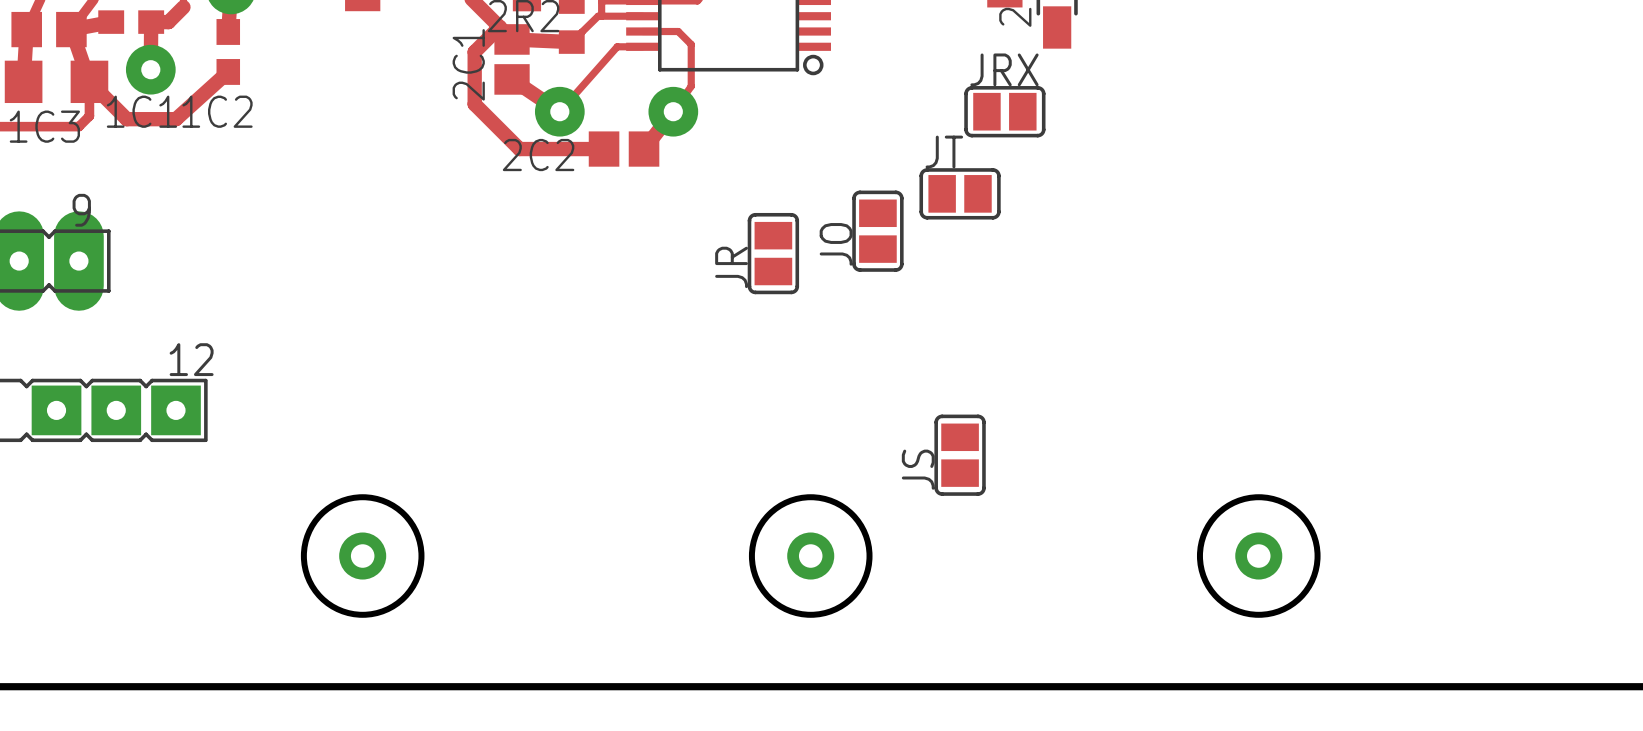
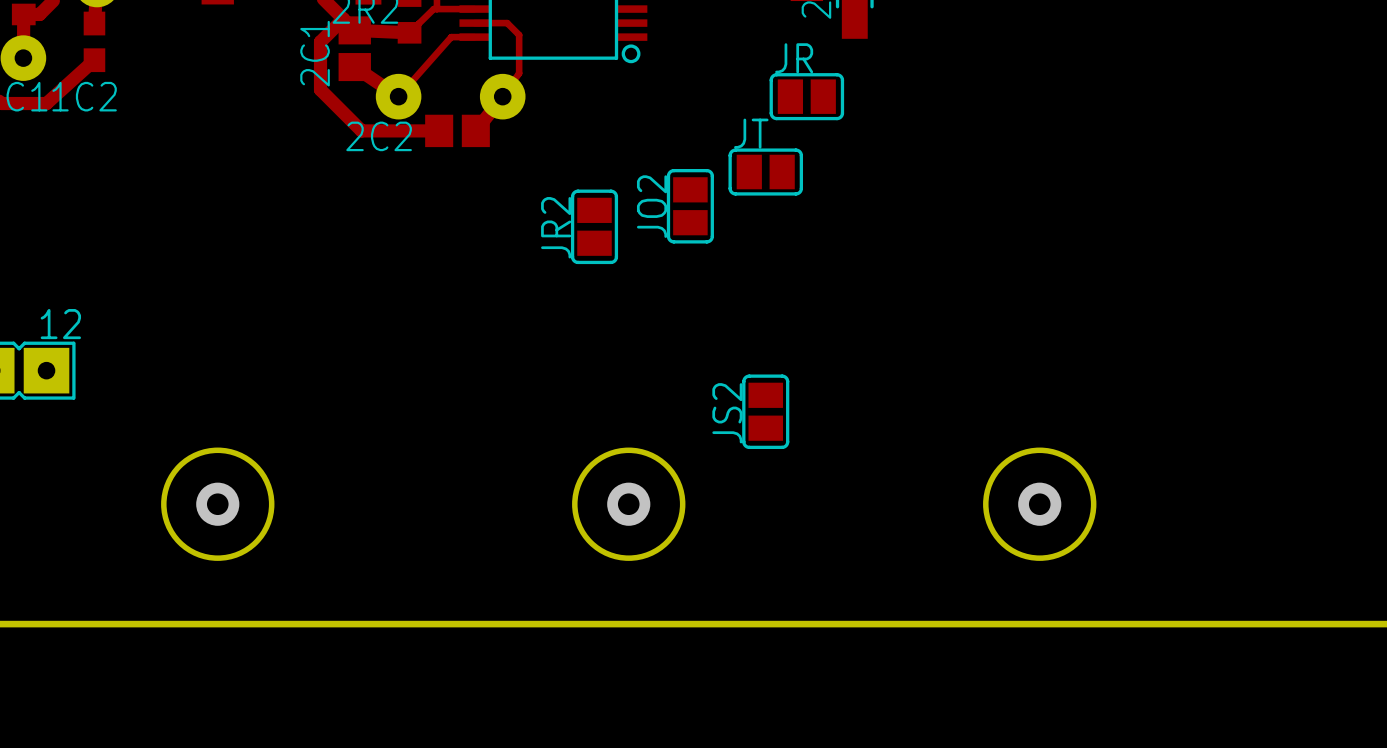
JRX name: JRX (1004, 69) -> JR (794, 58)
JO name: JO (836, 244) -> JO2 (652, 206)
JR name: JR (731, 267) -> JR2 (556, 227)
JS name: JS (918, 469) -> JS2 (727, 413)

